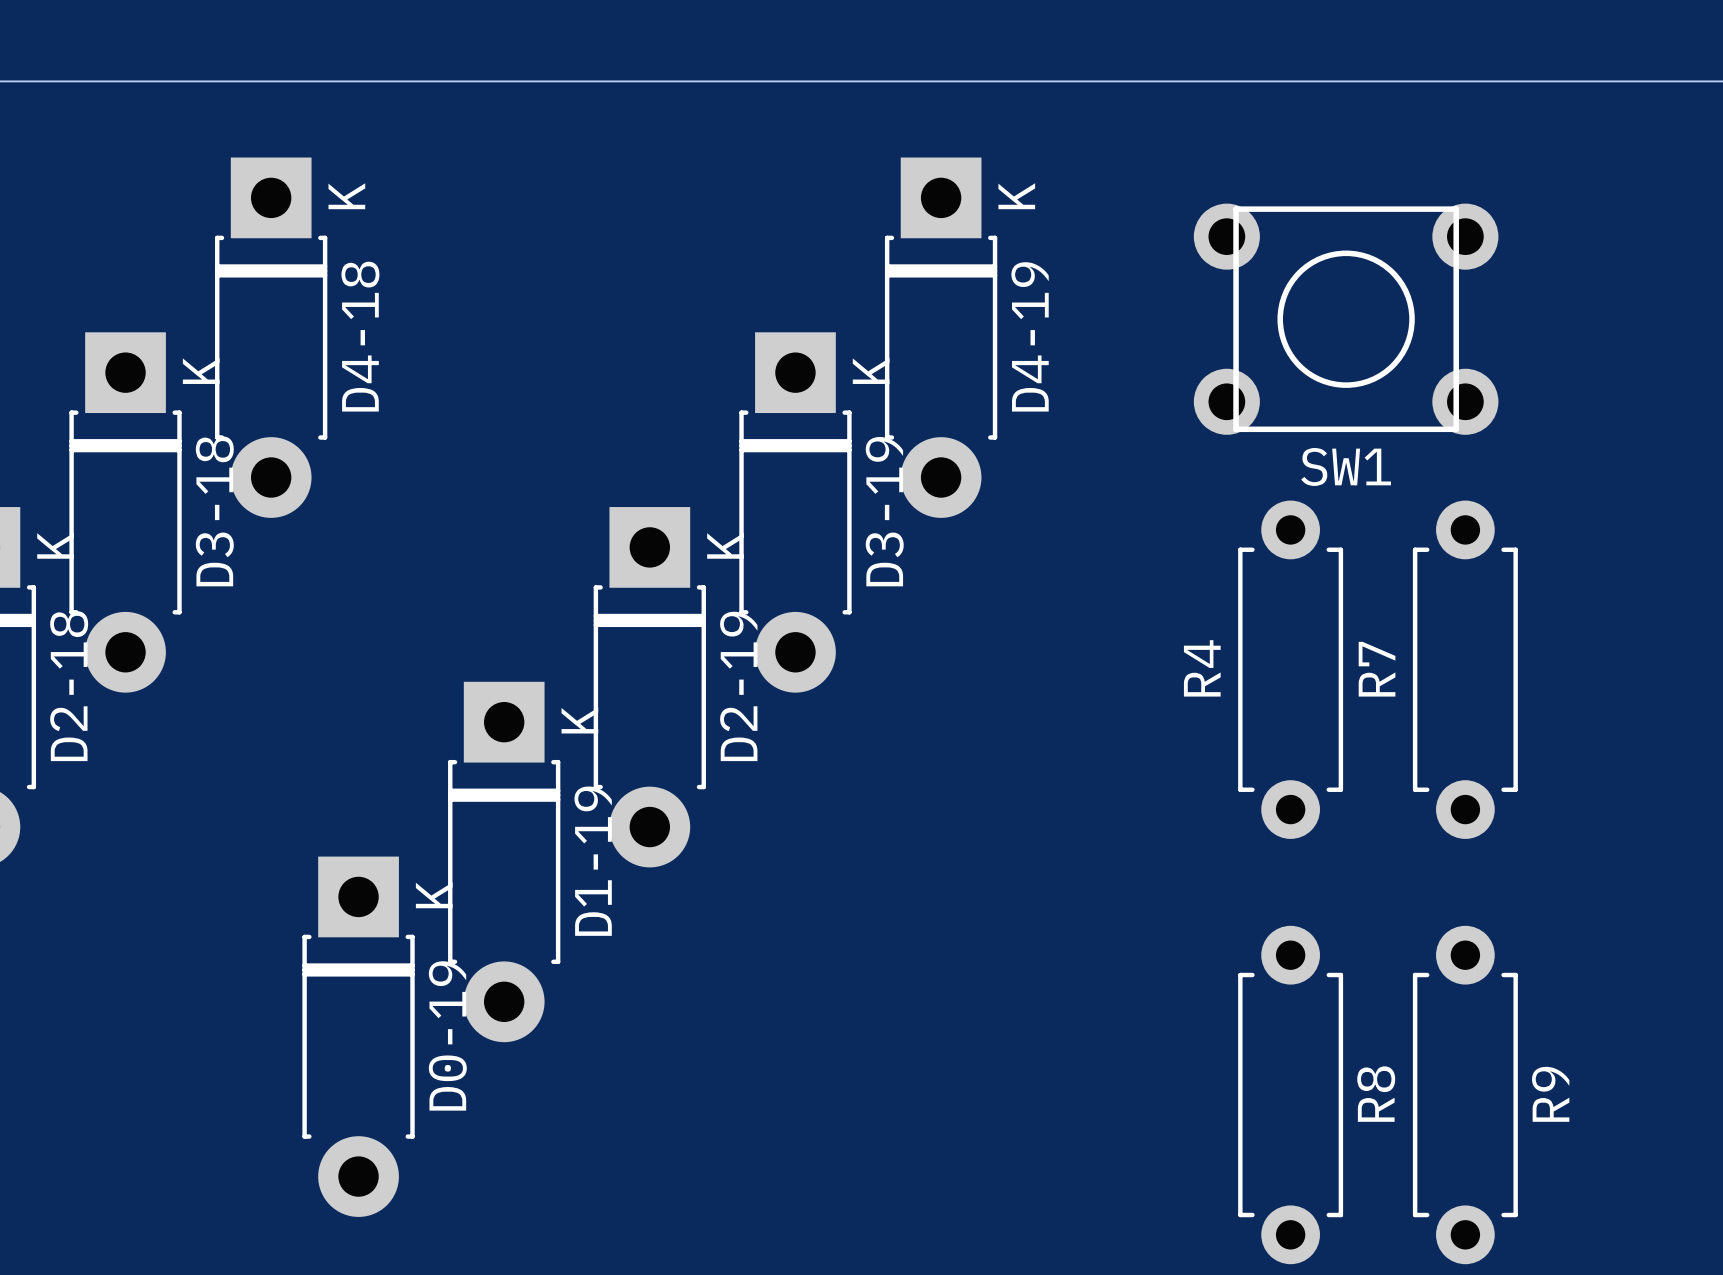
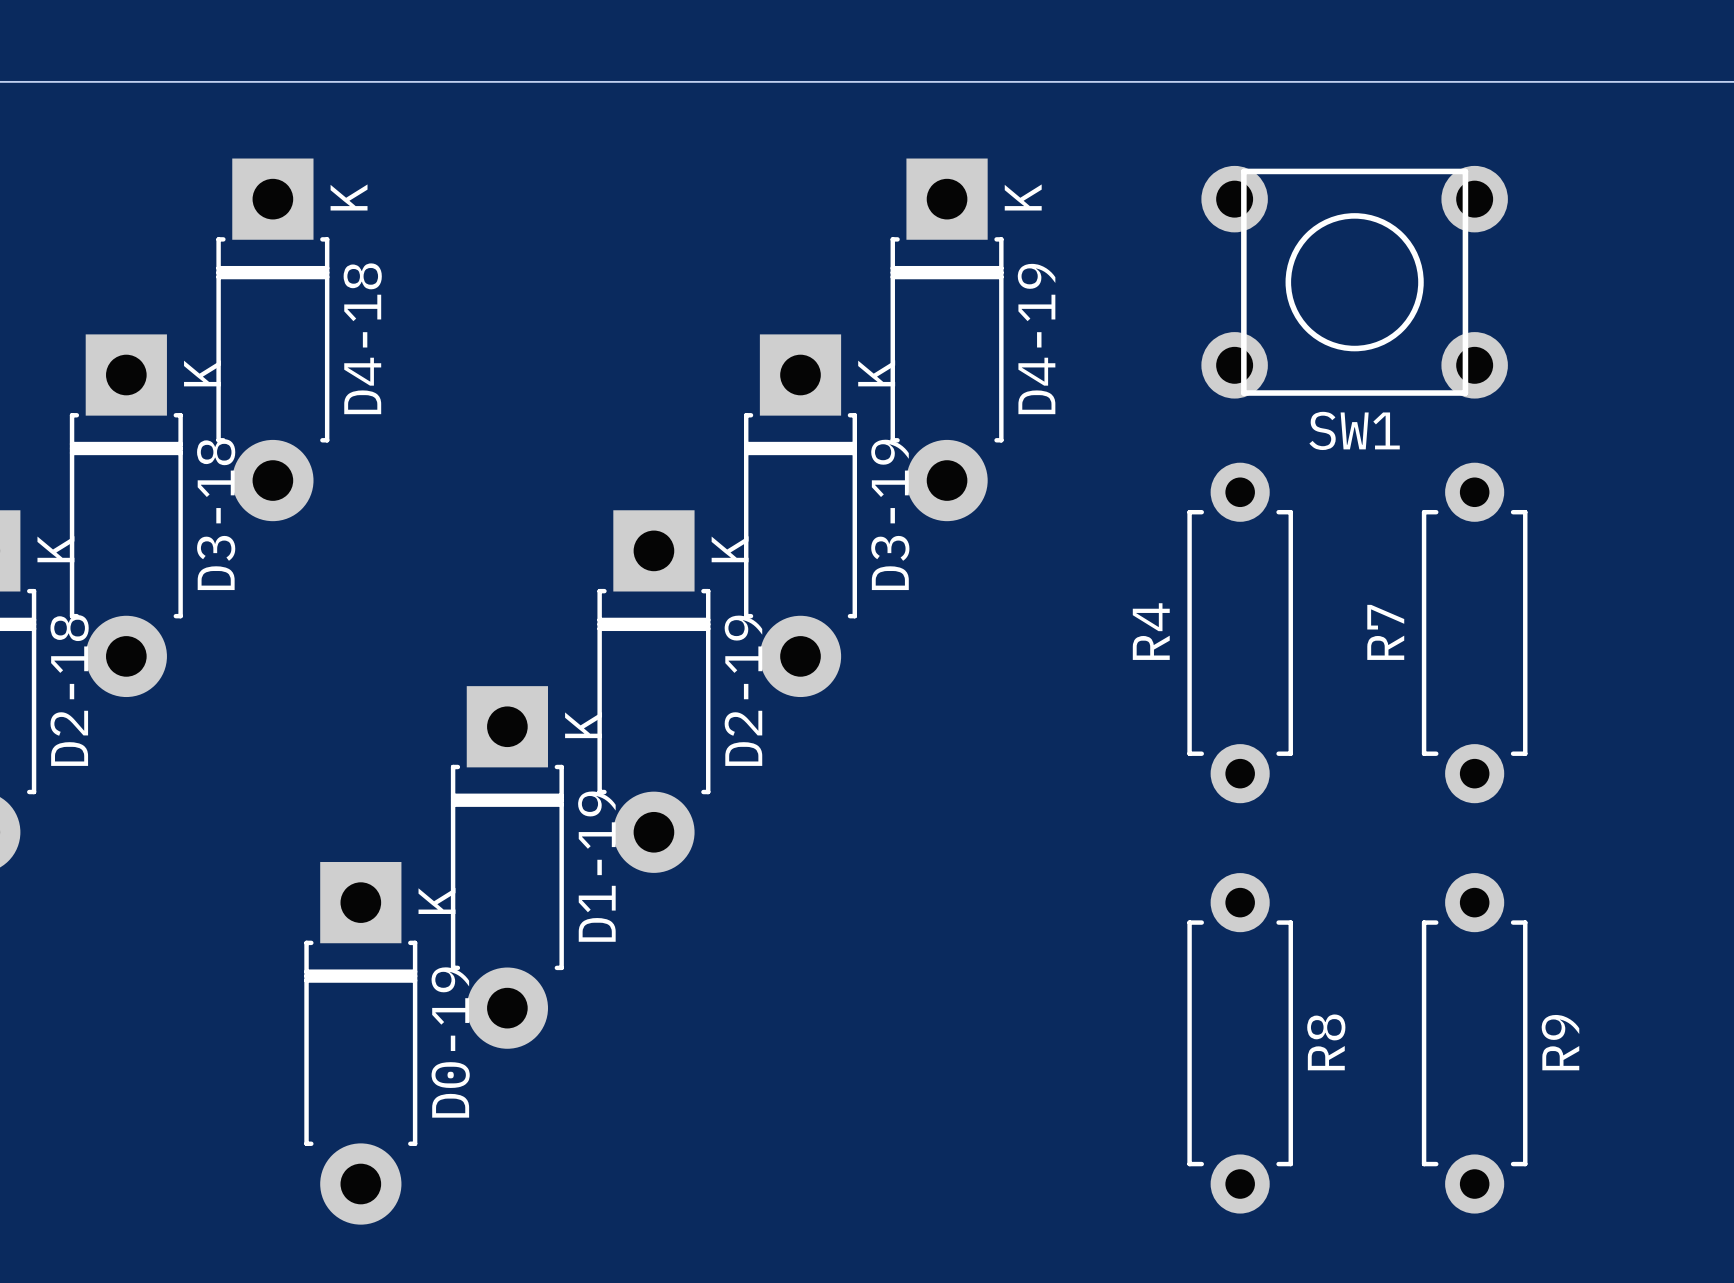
SW1 position: (1346, 319) -> (1354, 282)
R4 position: (1290, 669) -> (1240, 632)
R7 position: (1465, 669) -> (1474, 632)
R8 position: (1290, 1095) -> (1240, 1043)
R9 position: (1465, 1095) -> (1474, 1043)

